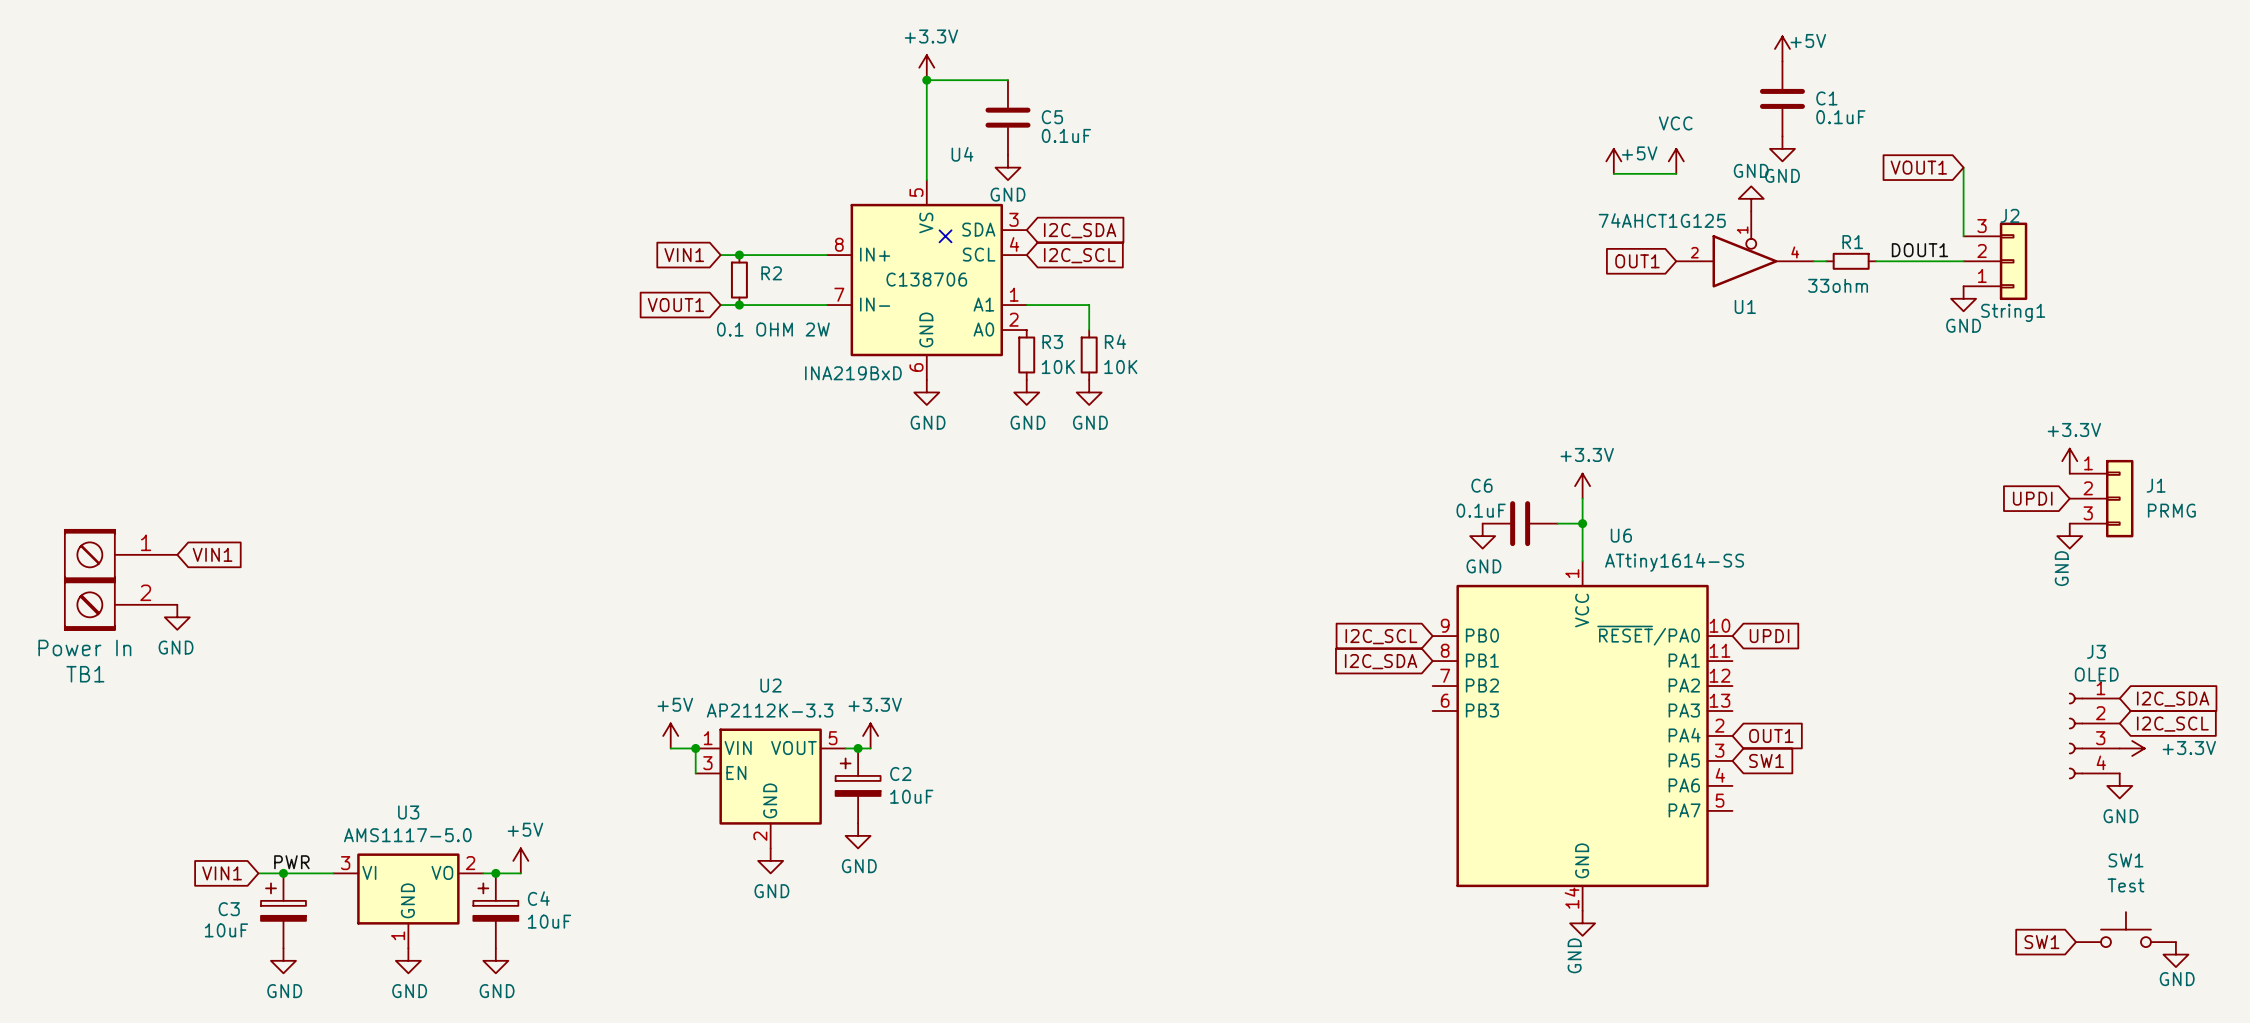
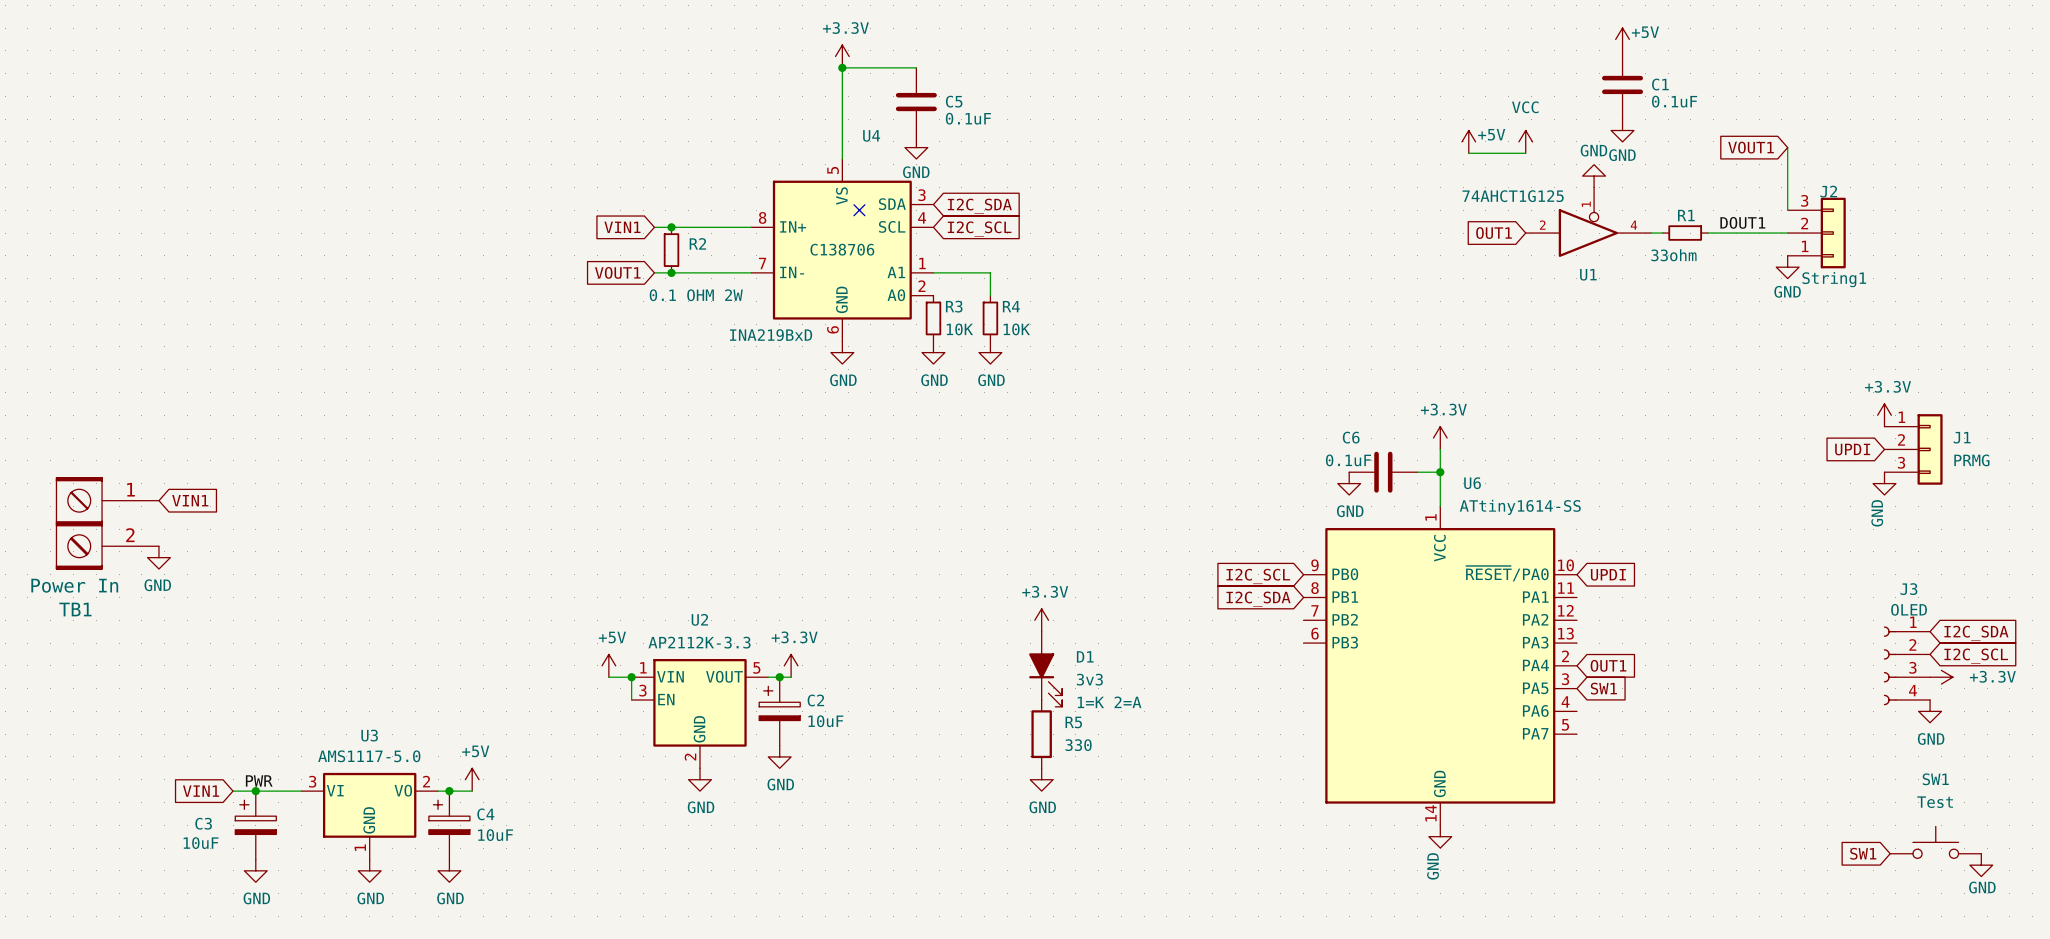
power symbol: none -> +3.3V (1041, 620)
D1: none -> 3v3 (1045, 669)
R5: none -> 330 (1041, 734)
power symbol: none -> GND (1041, 779)

